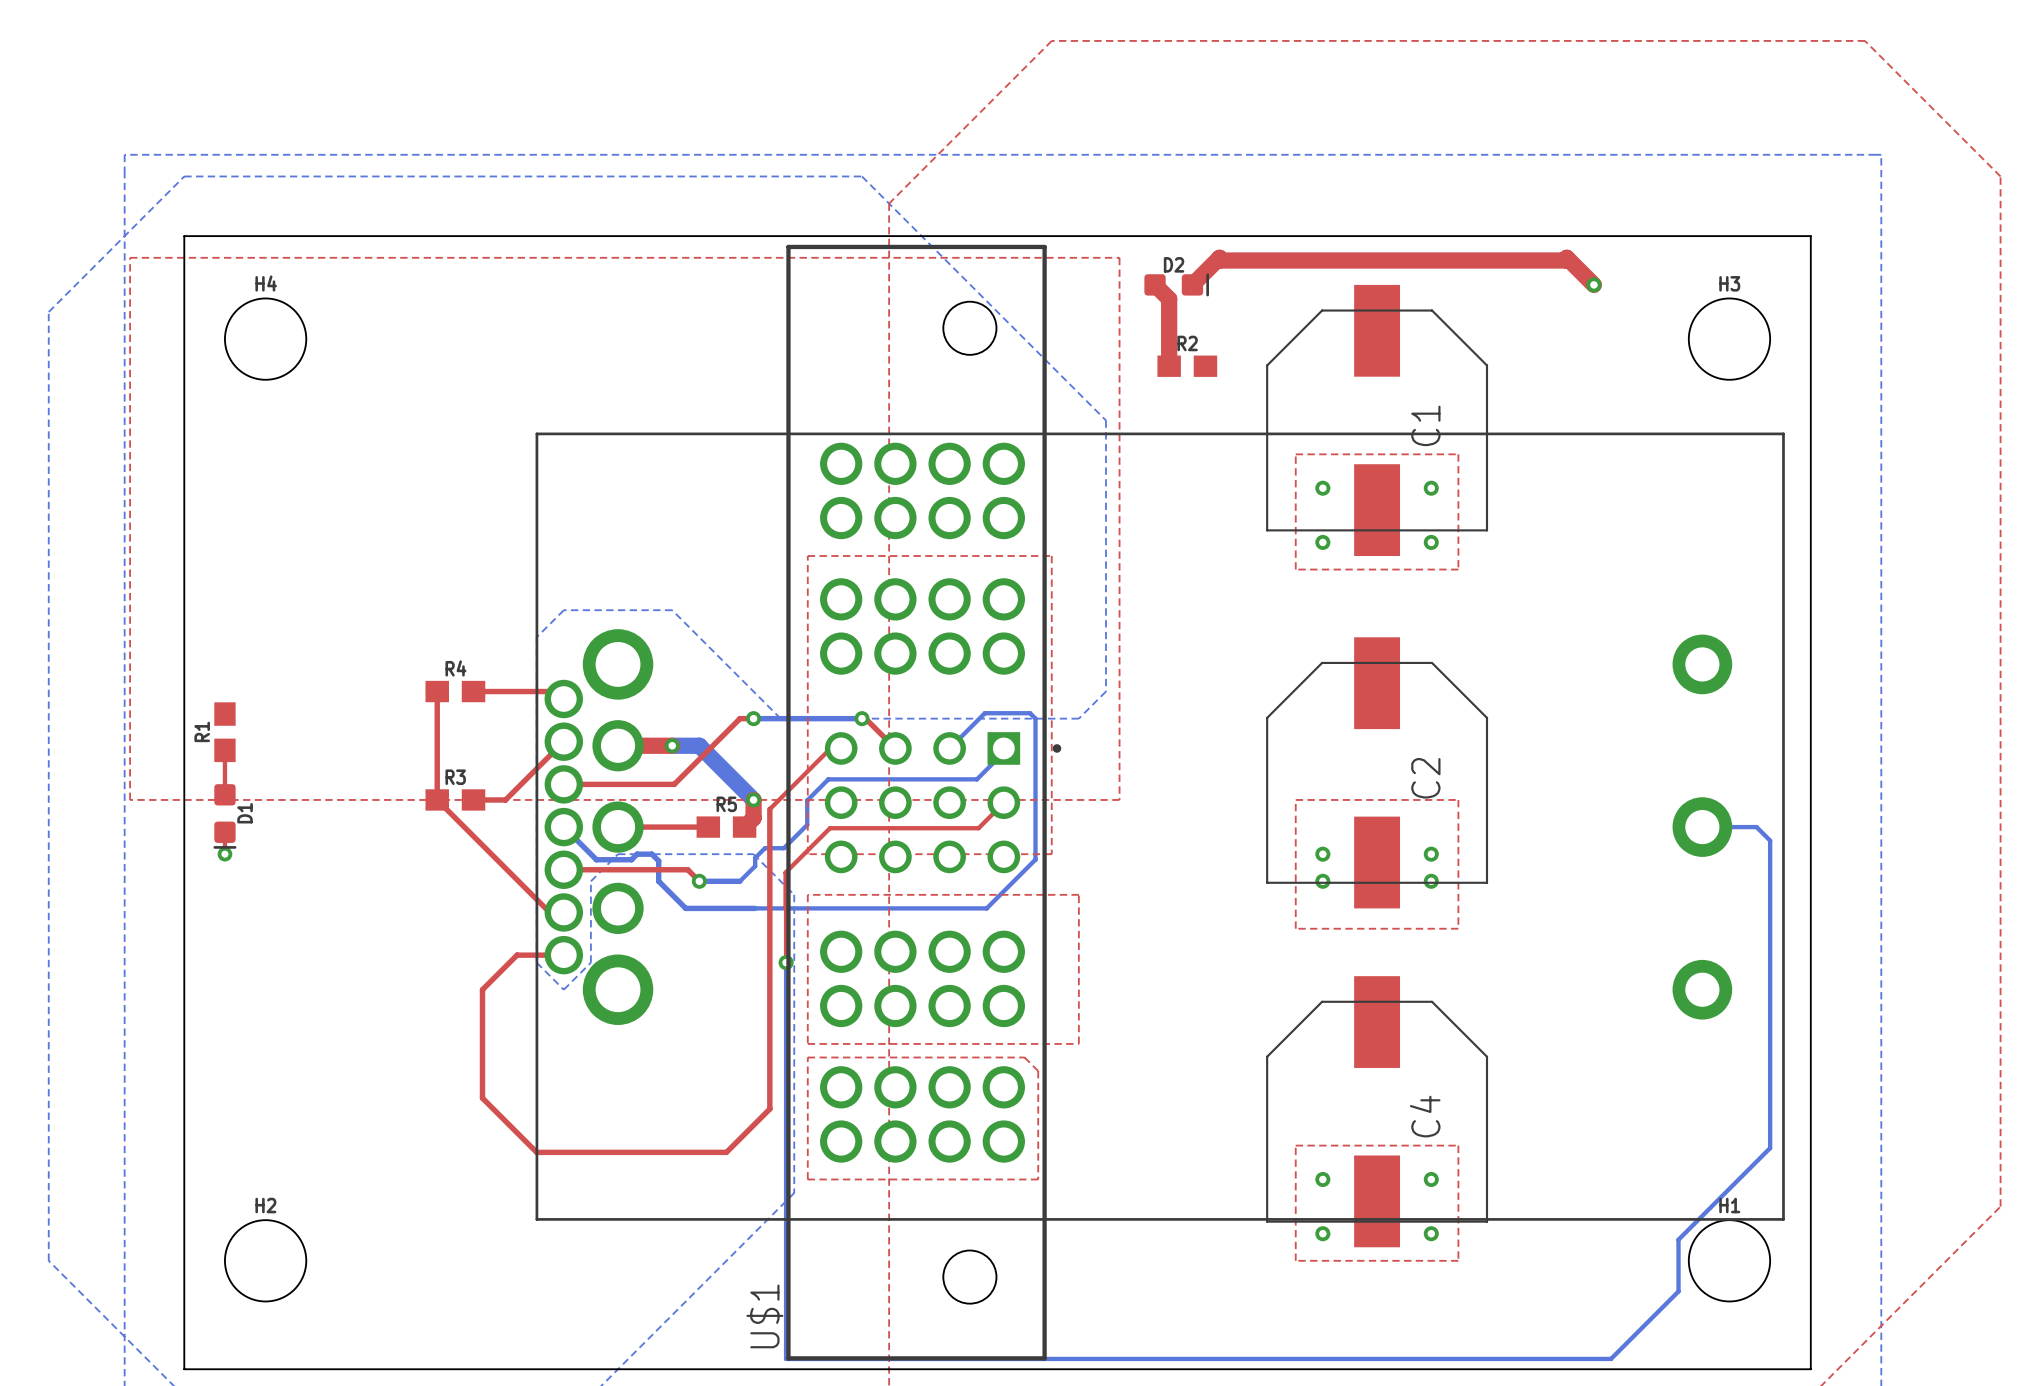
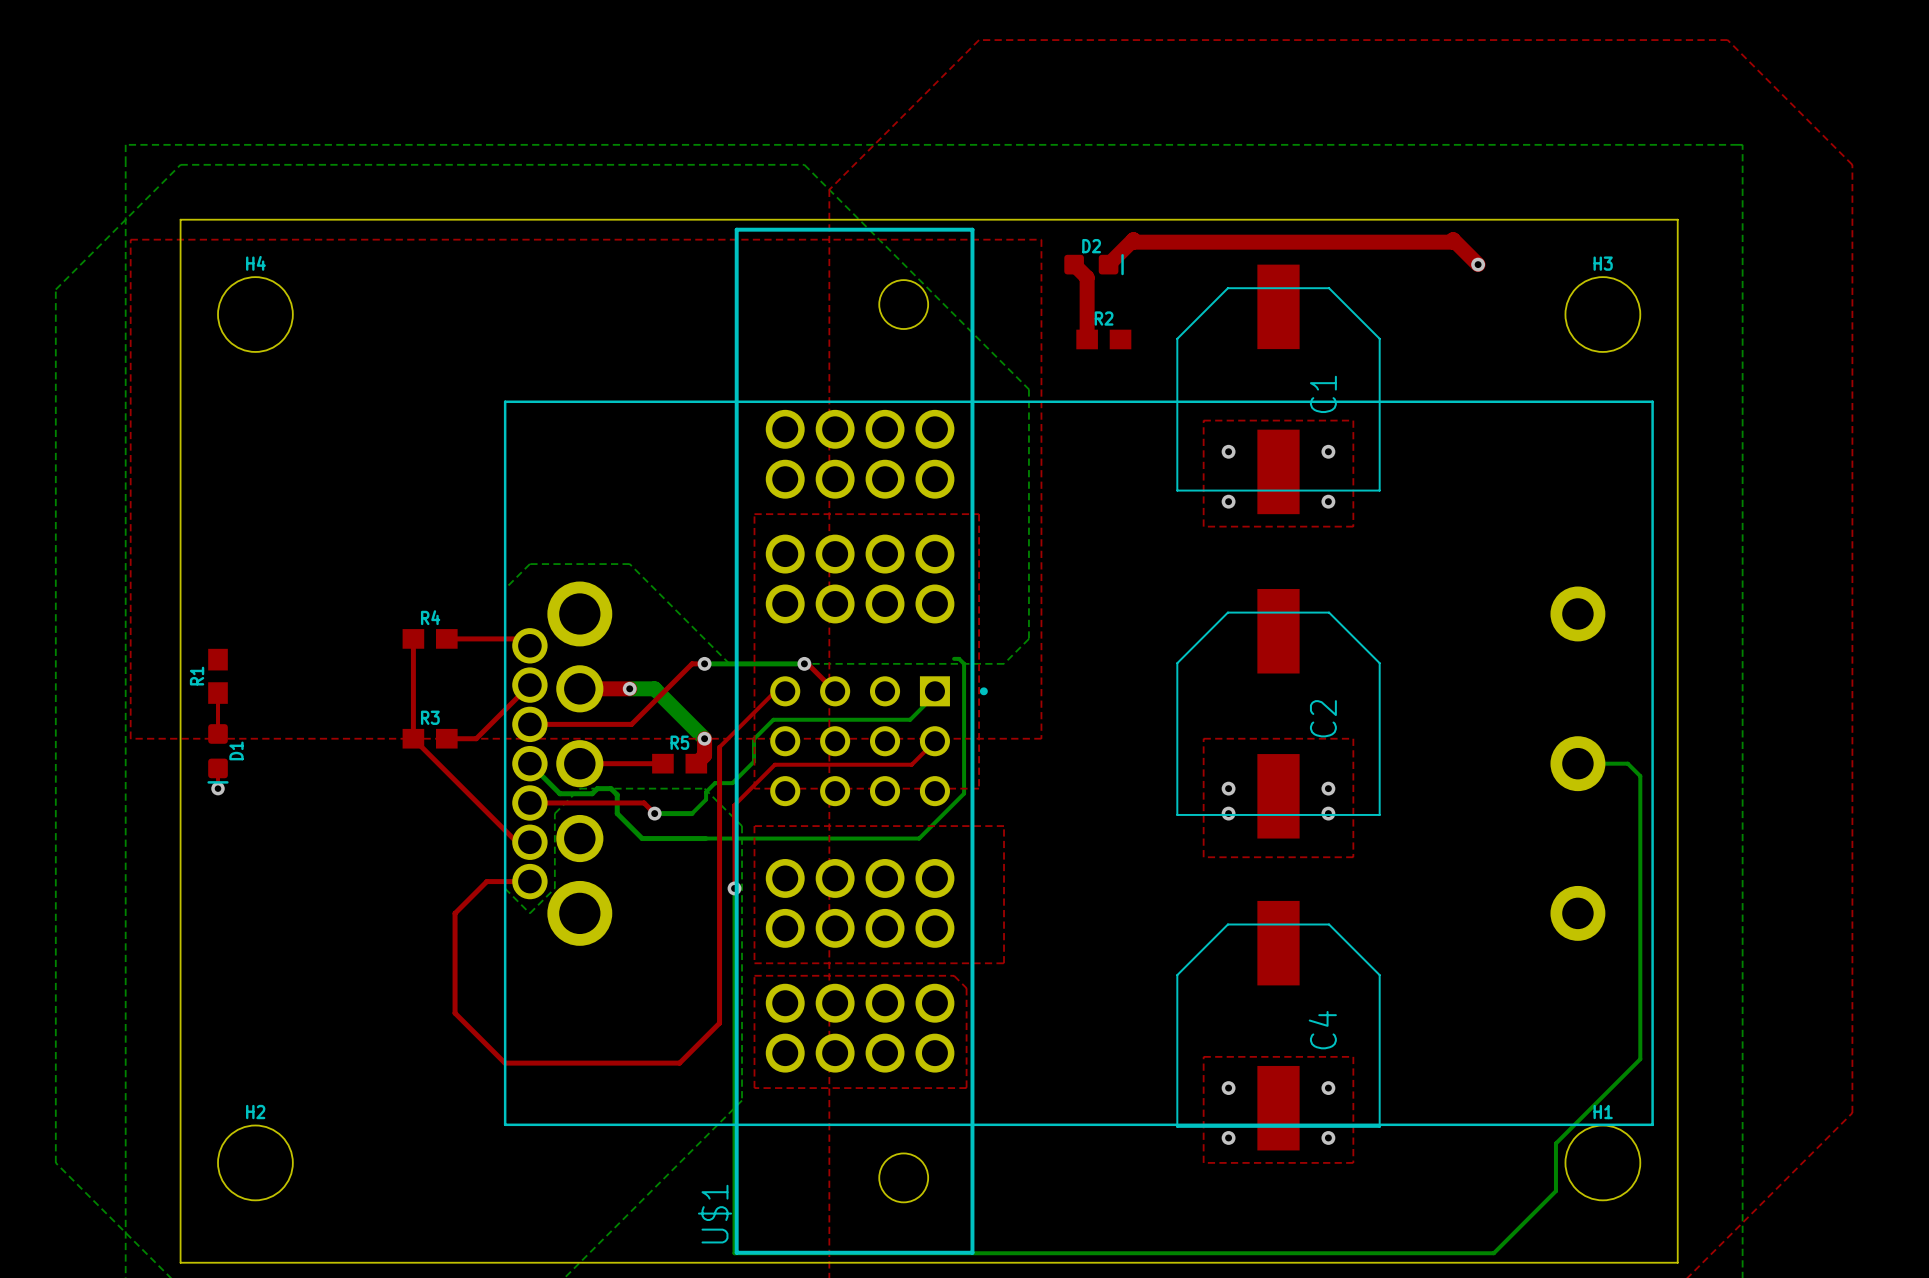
bottom track: (1024, 713) (984, 713) (949, 748) -> none

